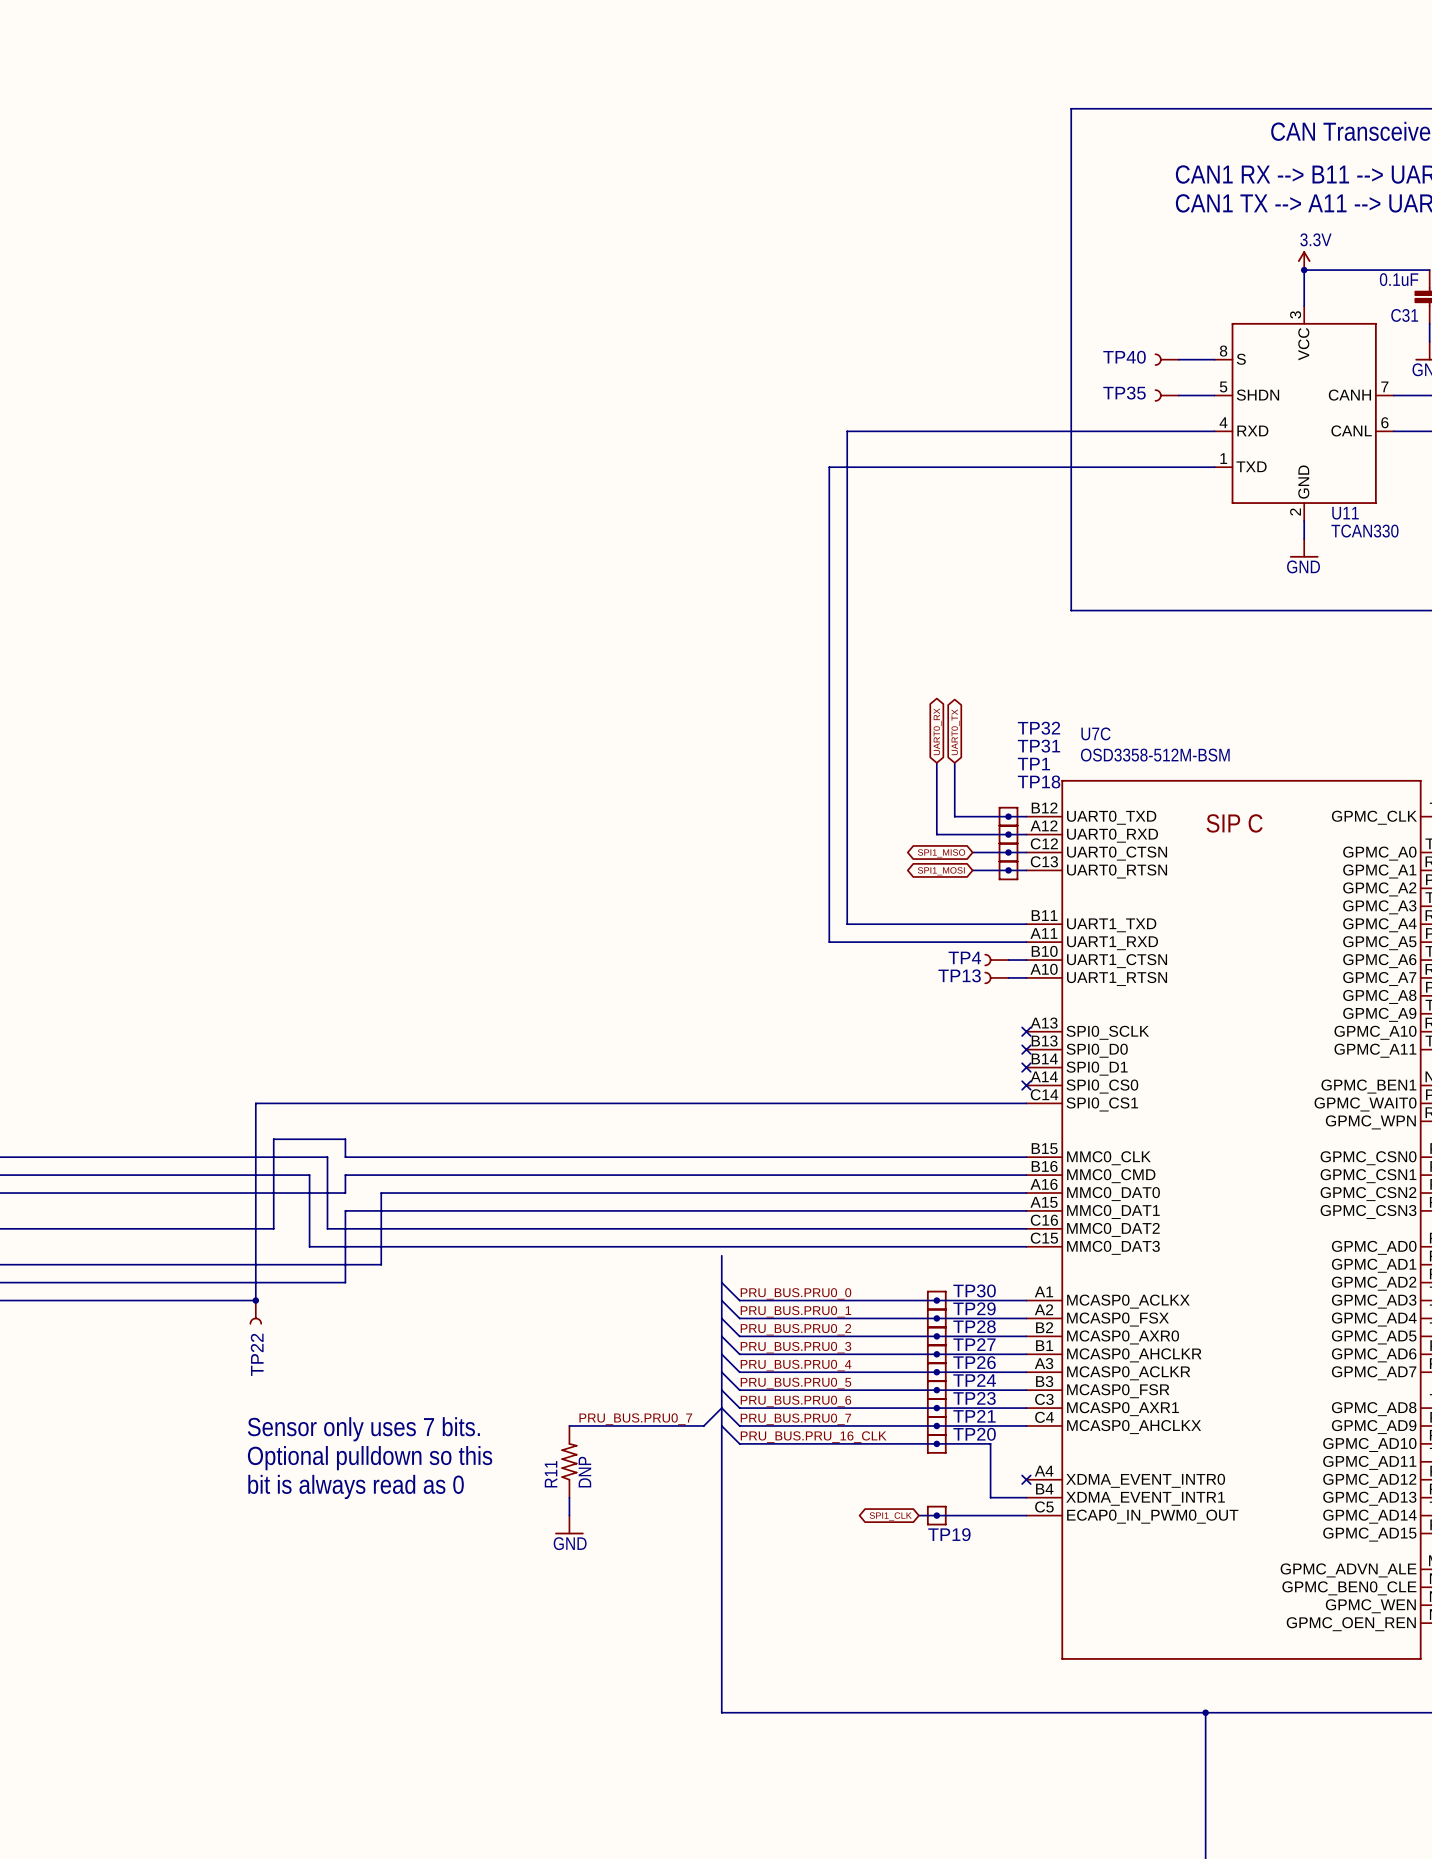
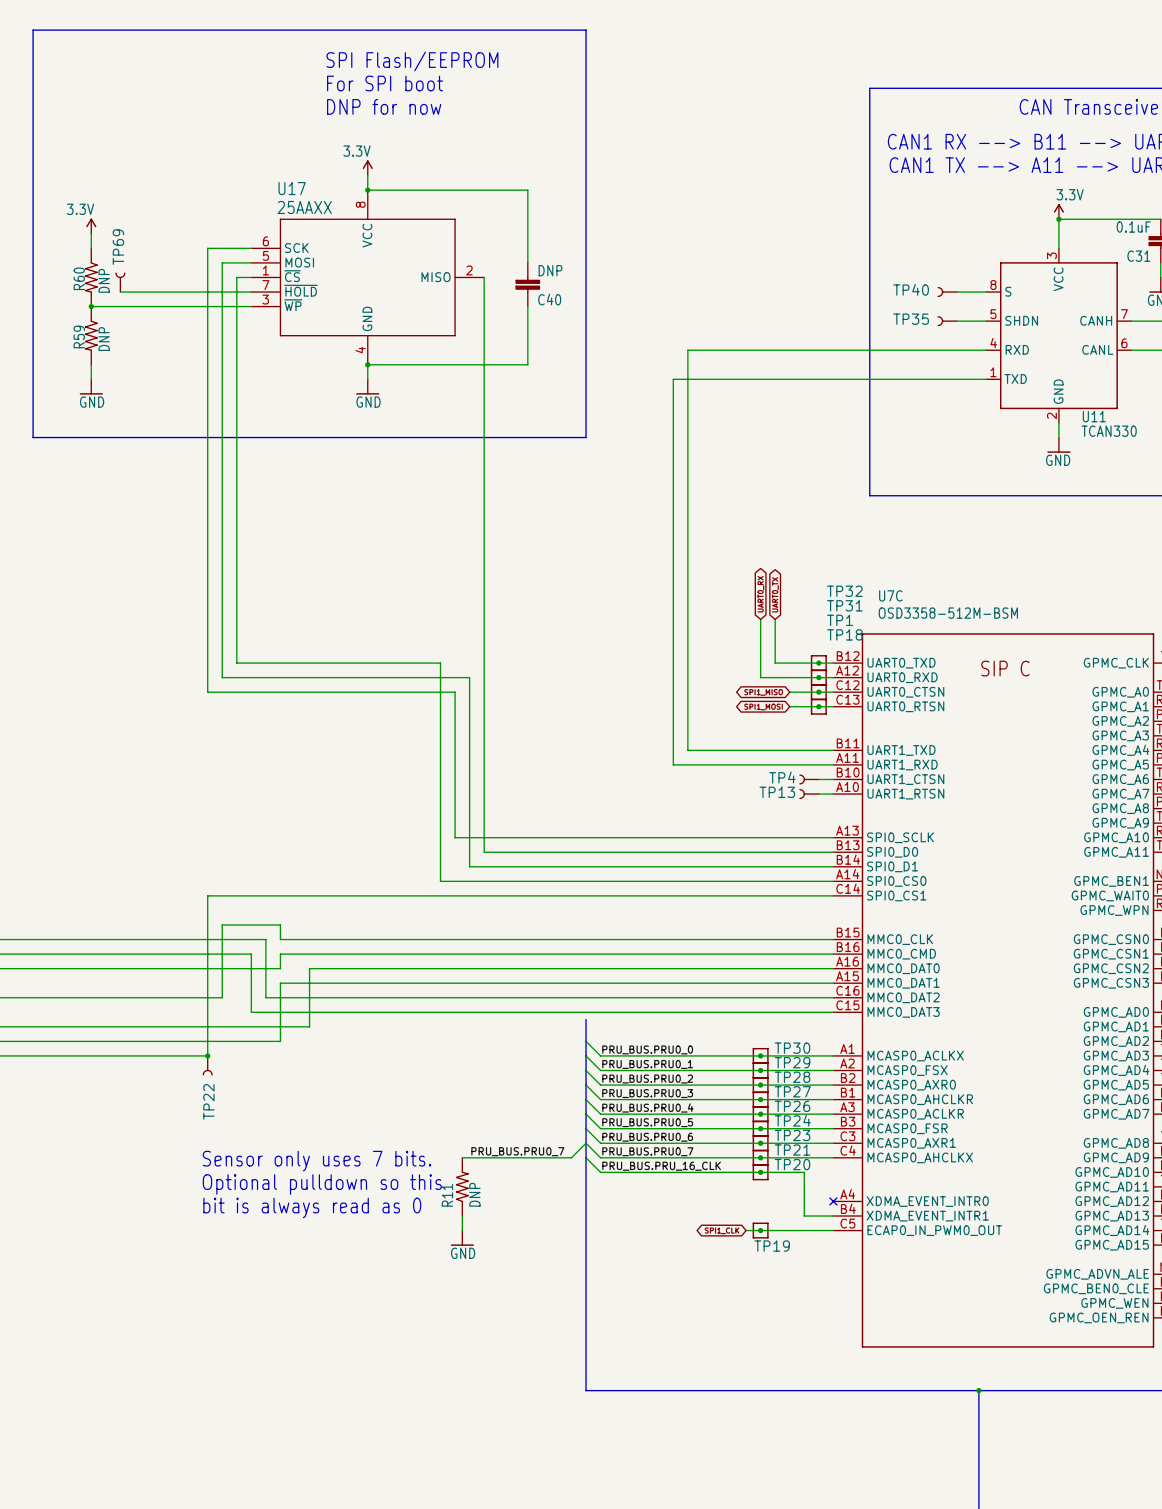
line: none -> (33, 30) (33, 437) (586, 437) (586, 30) (33, 30)
text: none -> SPI Flash/EEPROM (412, 61)
text: none -> For SPI boot (385, 83)
text: none -> DNP for now (384, 106)
power symbol: none -> 3.3V (367, 167)
wire: none -> (367, 175) (367, 190) (527, 190) (527, 262)
junction: none -> (367, 190)
power symbol: none -> 3.3V (91, 226)
wire: none -> (91, 233) (91, 248)
wire: none -> (251, 248) (207, 248) (207, 692) (455, 692) (455, 837) (833, 837)
wire: none -> (251, 262) (222, 262) (222, 677) (469, 677) (469, 866) (833, 866)
R60: none -> DNP (91, 277)
wire: none -> (251, 277) (236, 277) (236, 663) (440, 663) (440, 881) (833, 881)
U17: none -> 25AAXX (367, 277)
wire: none -> (484, 277) (484, 852) (833, 852)
TP69: none -> (120, 282)
C40: none -> DNP (527, 284)
wire: none -> (120, 292) (251, 292)
wire: none -> (91, 306) (251, 306)
junction: none -> (91, 306)
wire: none -> (527, 306) (527, 364) (367, 364) (367, 379)
R59: none -> DNP (91, 335)
wire: none -> (91, 364) (91, 379)
junction: none -> (367, 364)
power symbol: none -> GND (91, 386)
power symbol: none -> GND (367, 386)
no-connect mark: (1026, 1031) -> none
no-connect mark: (1026, 1049) -> none
no-connect mark: (1026, 1067) -> none
no-connect mark: (1026, 1085) -> none

